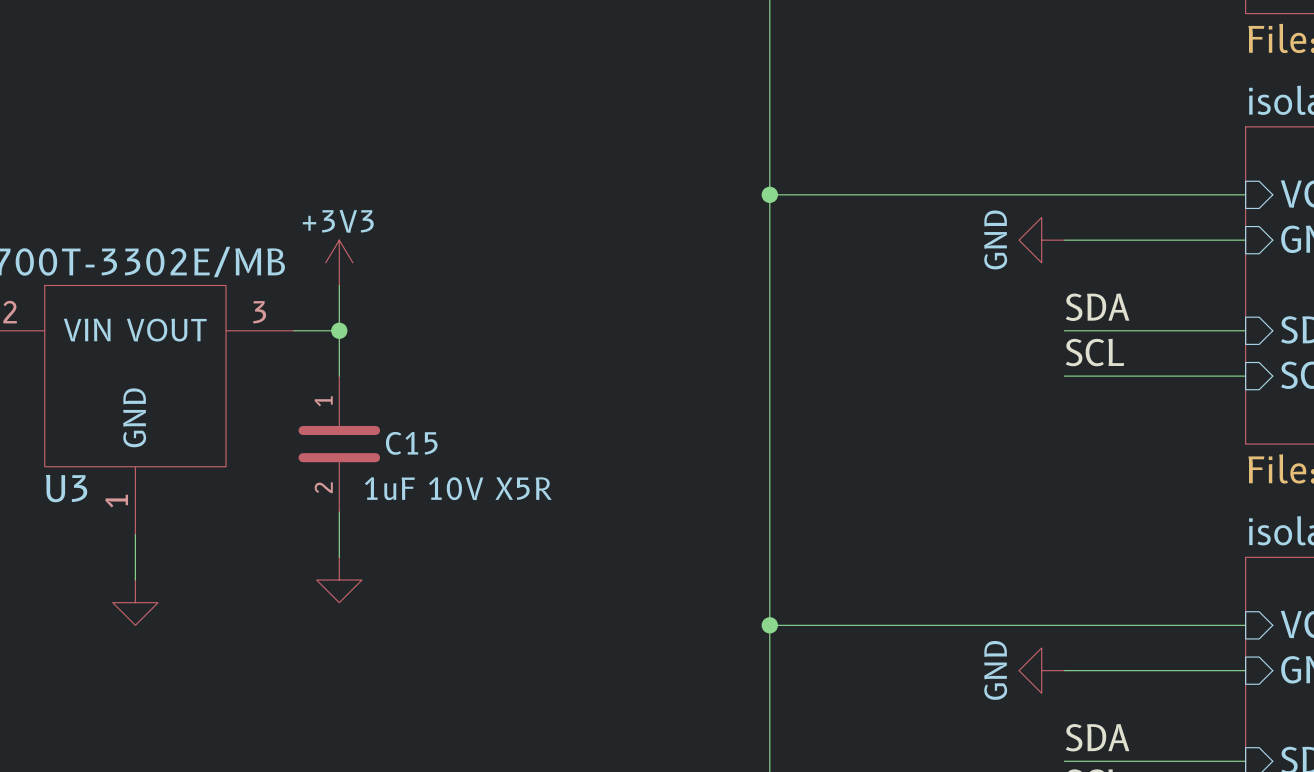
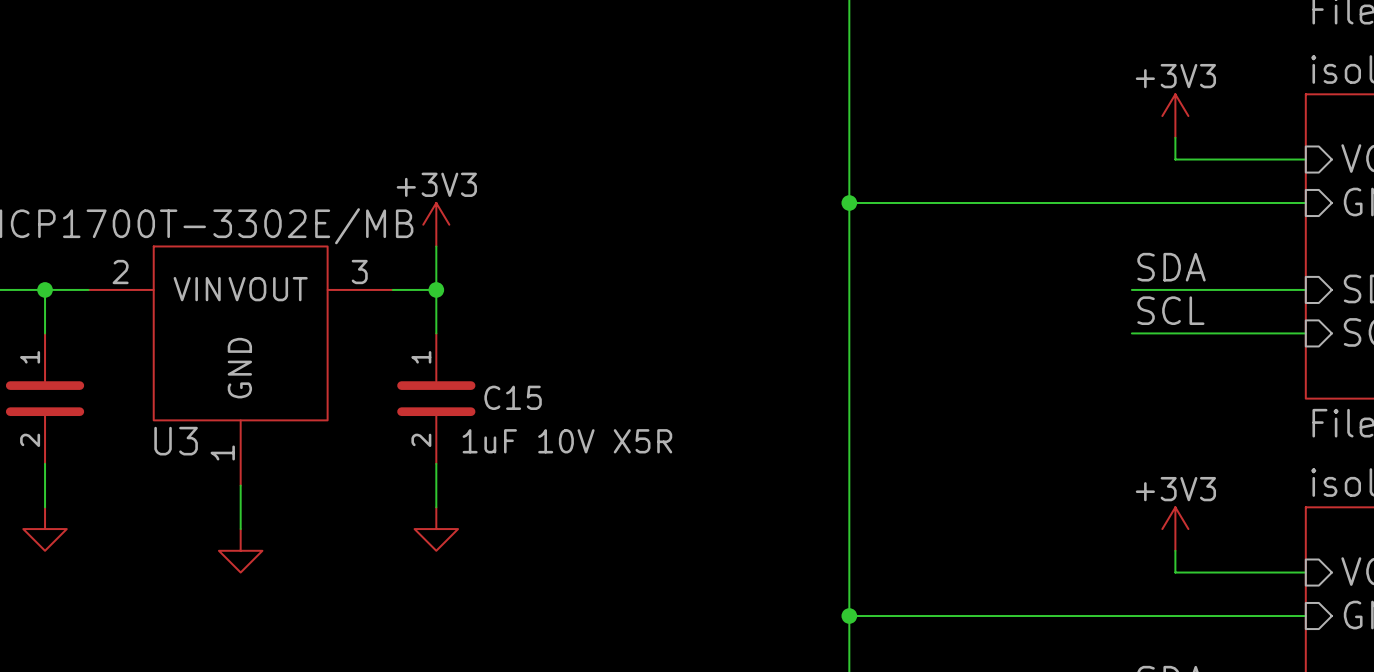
power symbol: none -> +3V3 (1175, 116)
wire: (769, 194) (1109, 194) -> (1175, 137) (1175, 159)
junction position: (769, 194) -> (849, 202)
wire: none -> (849, 202) (1131, 202)
power symbol: GND (1041, 240) -> none
power symbol: none -> +3V3 (1175, 529)
wire: (769, 625) (1109, 625) -> (1175, 550) (1175, 572)
junction position: (769, 625) -> (849, 616)
wire: none -> (849, 616) (1131, 616)
power symbol: GND (1041, 670) -> none

